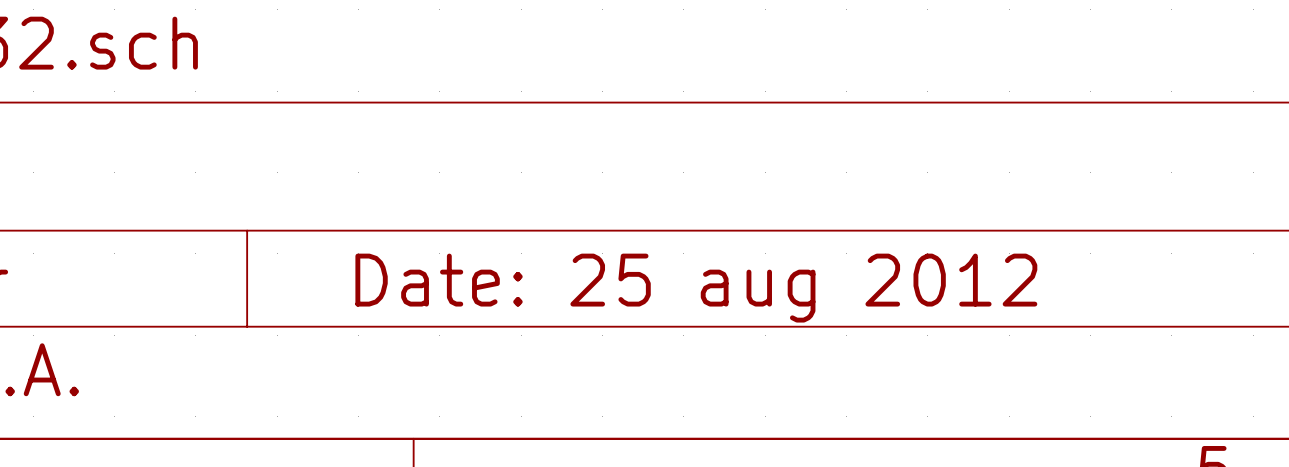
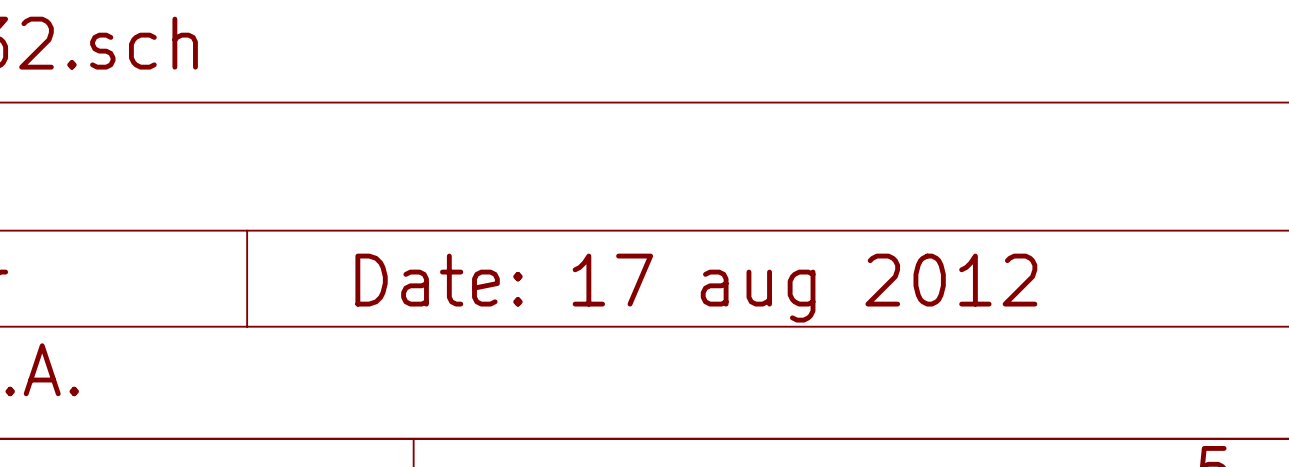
title block: Date: 25 aug 2012 (696, 288) -> Date: 17 aug 2012 (696, 288)

